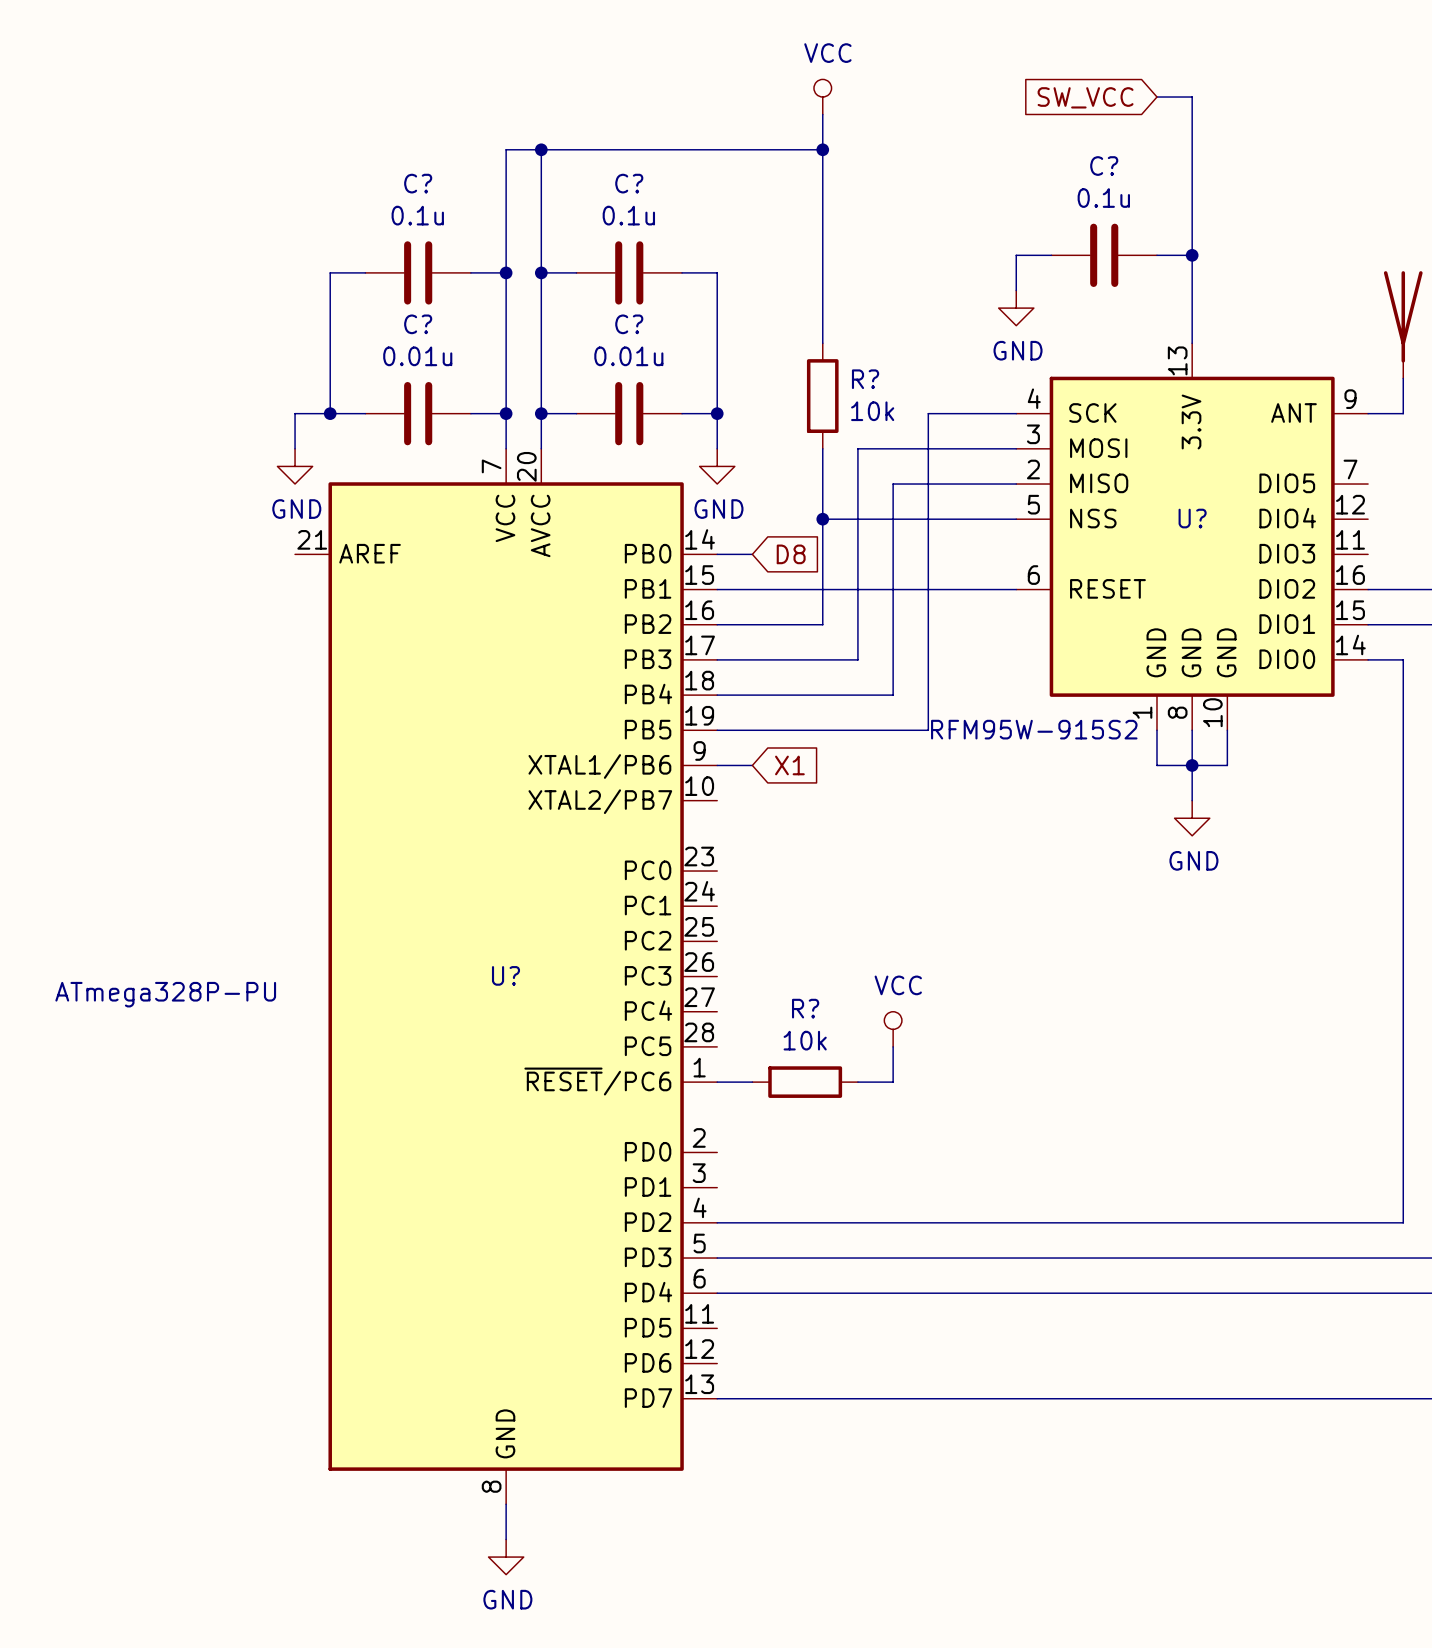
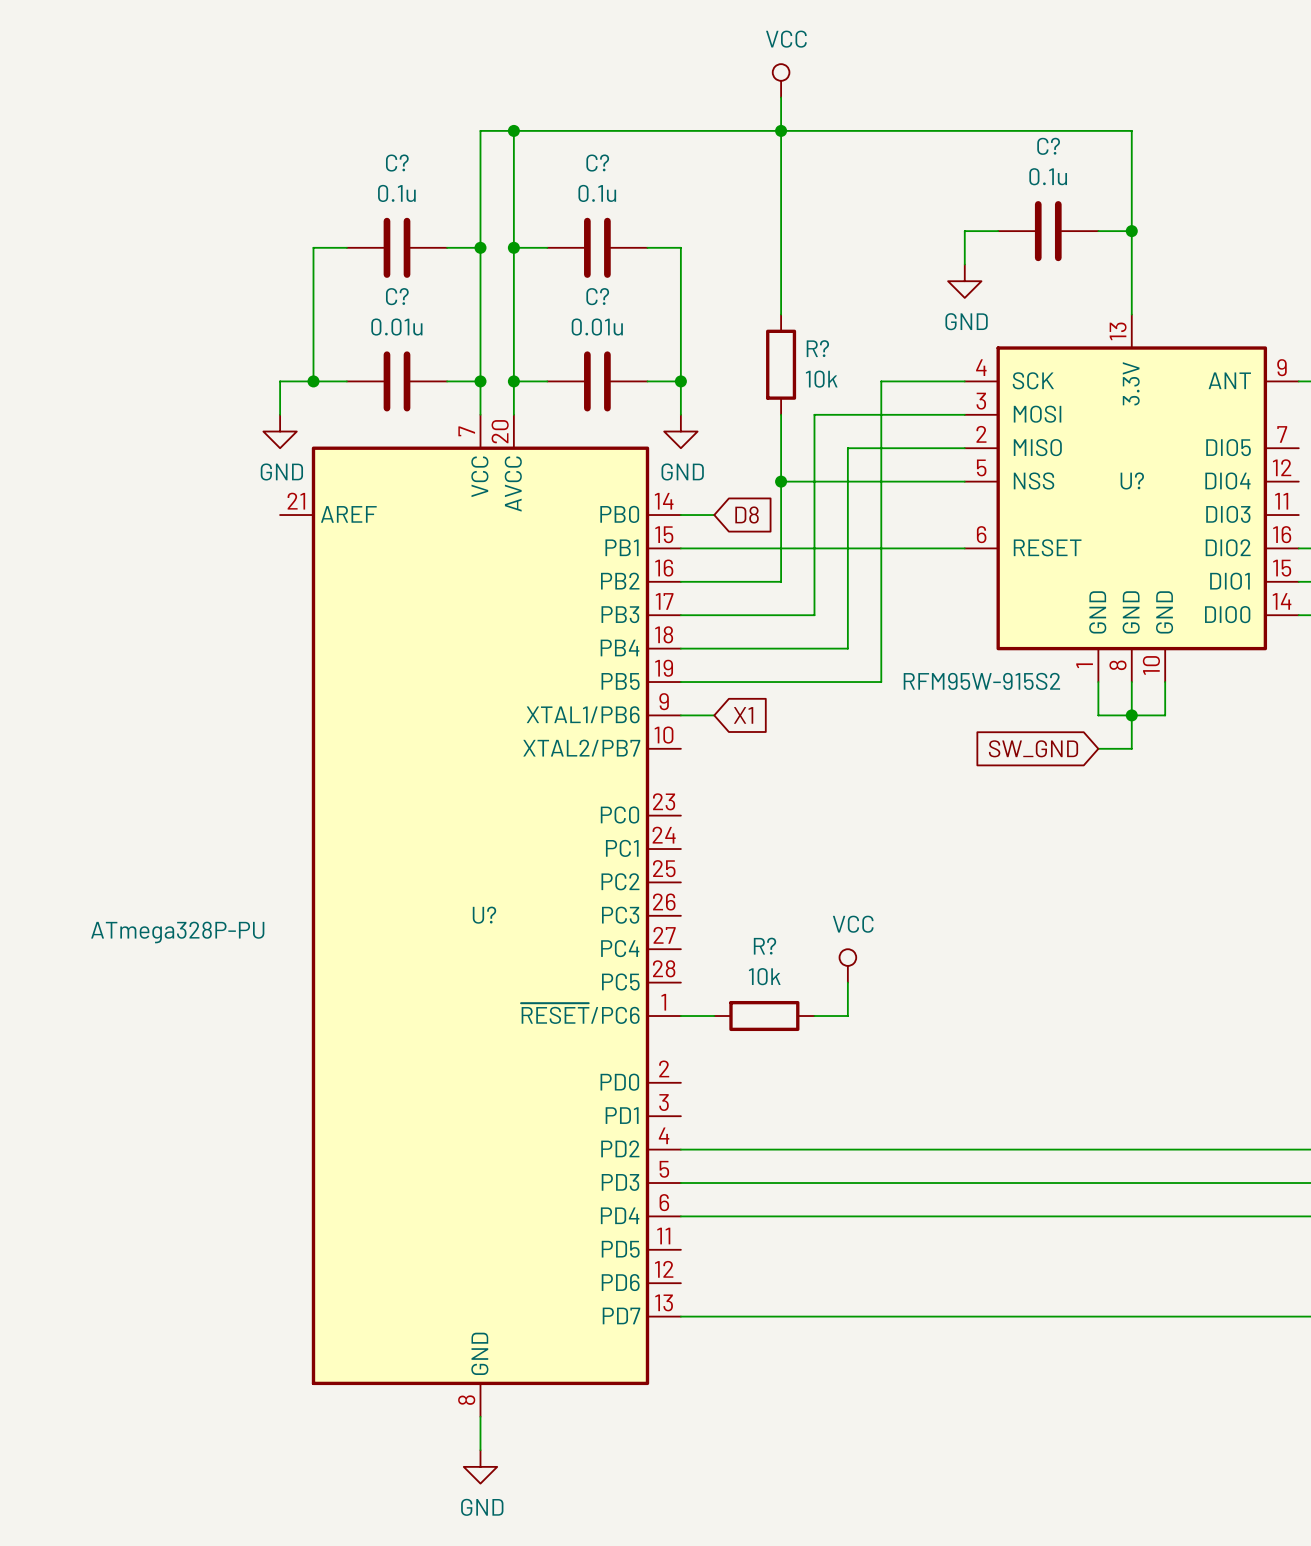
global label: SW_VCC (1085, 97) -> none
wire: (1156, 97) (1192, 97) (1192, 149) -> (781, 130) (1131, 130)
wire: none -> (1098, 748) (1131, 748)
global label: none -> SW_GND (1033, 748)
power symbol: GND (1192, 818) -> none

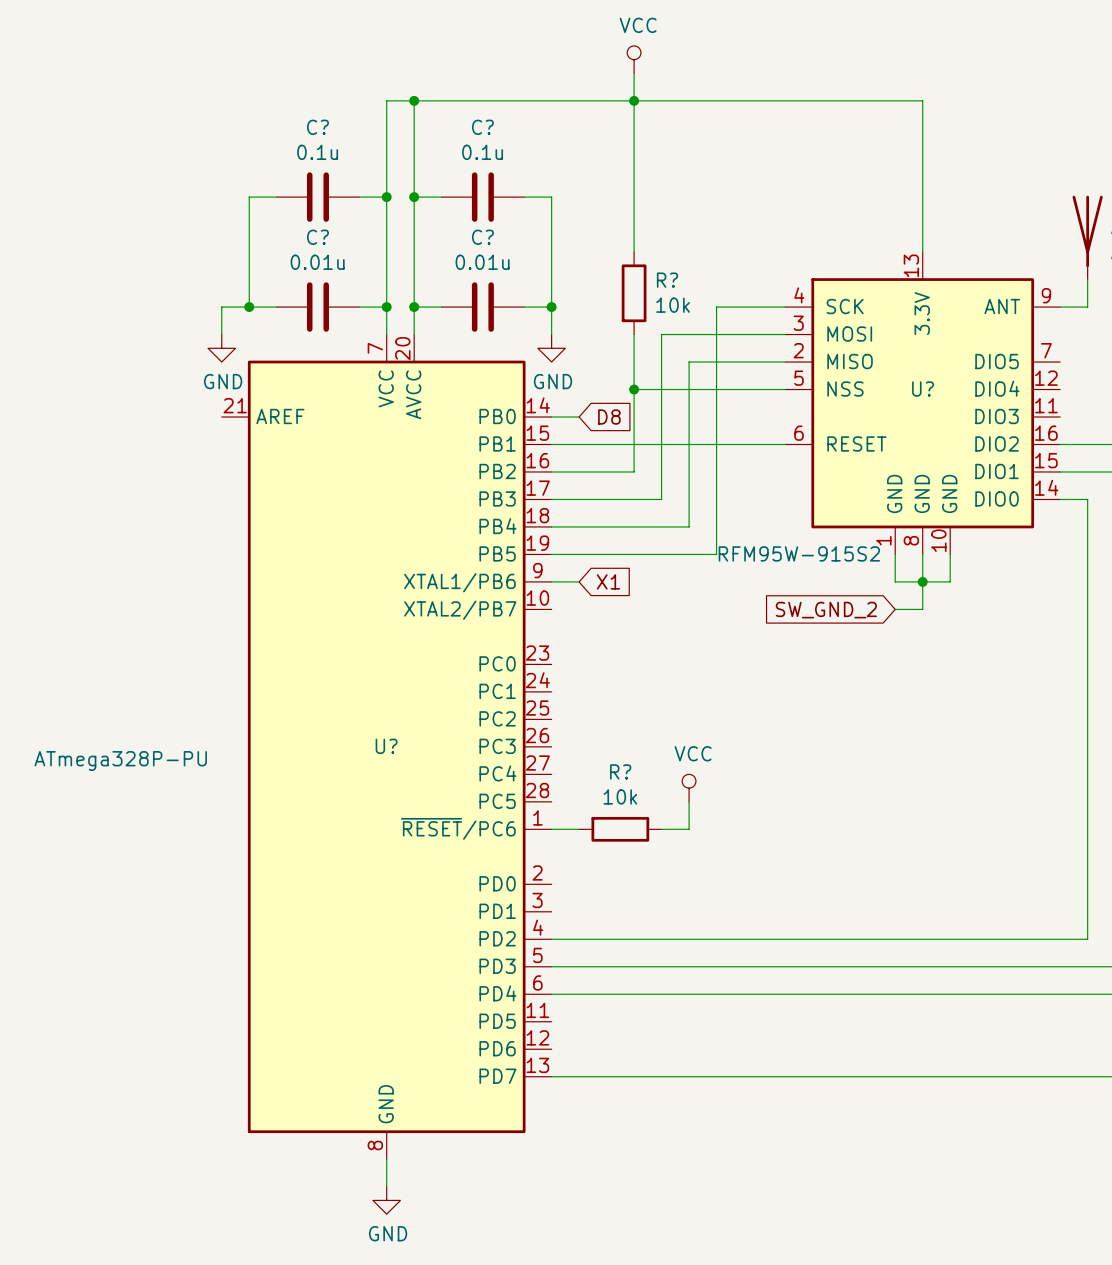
wire: (998, 231) (964, 231) (964, 264) -> none
C?: 0.1u (1048, 231) -> none
wire: (1098, 231) (1131, 231) -> none
junction: (1131, 231) -> none
power symbol: GND (964, 281) -> none
global label: SW_GND (1033, 748) -> SW_GND_2 (826, 610)

